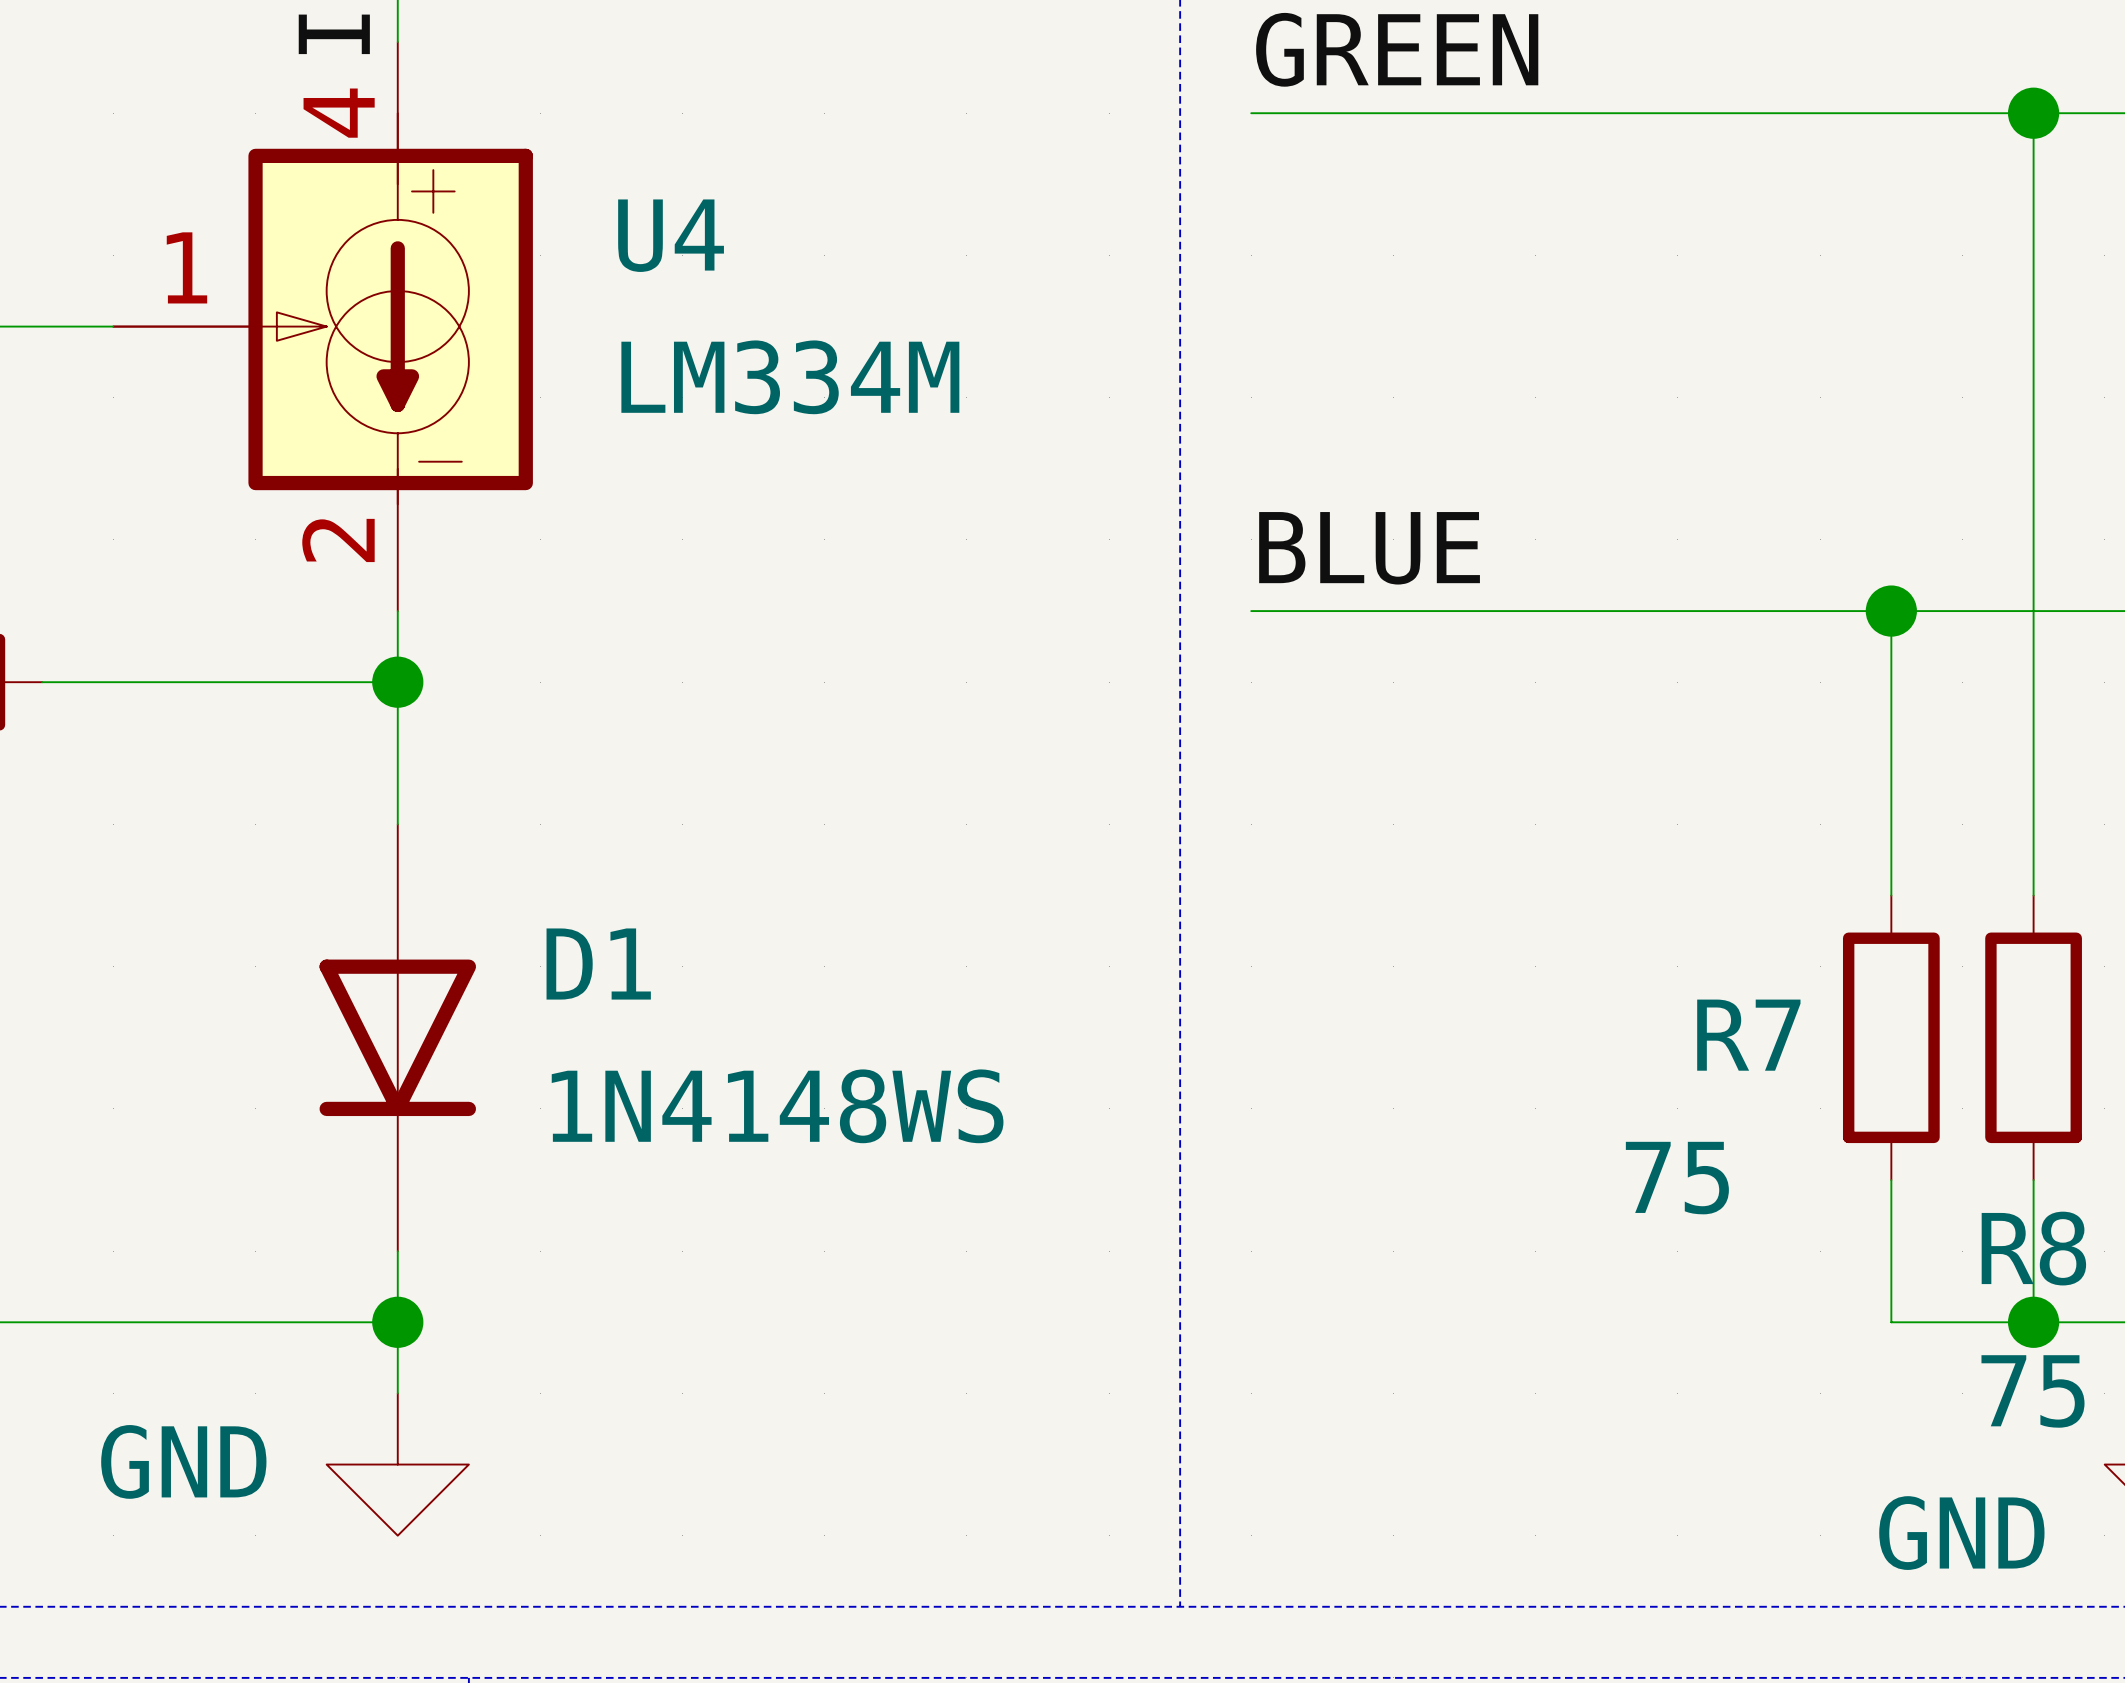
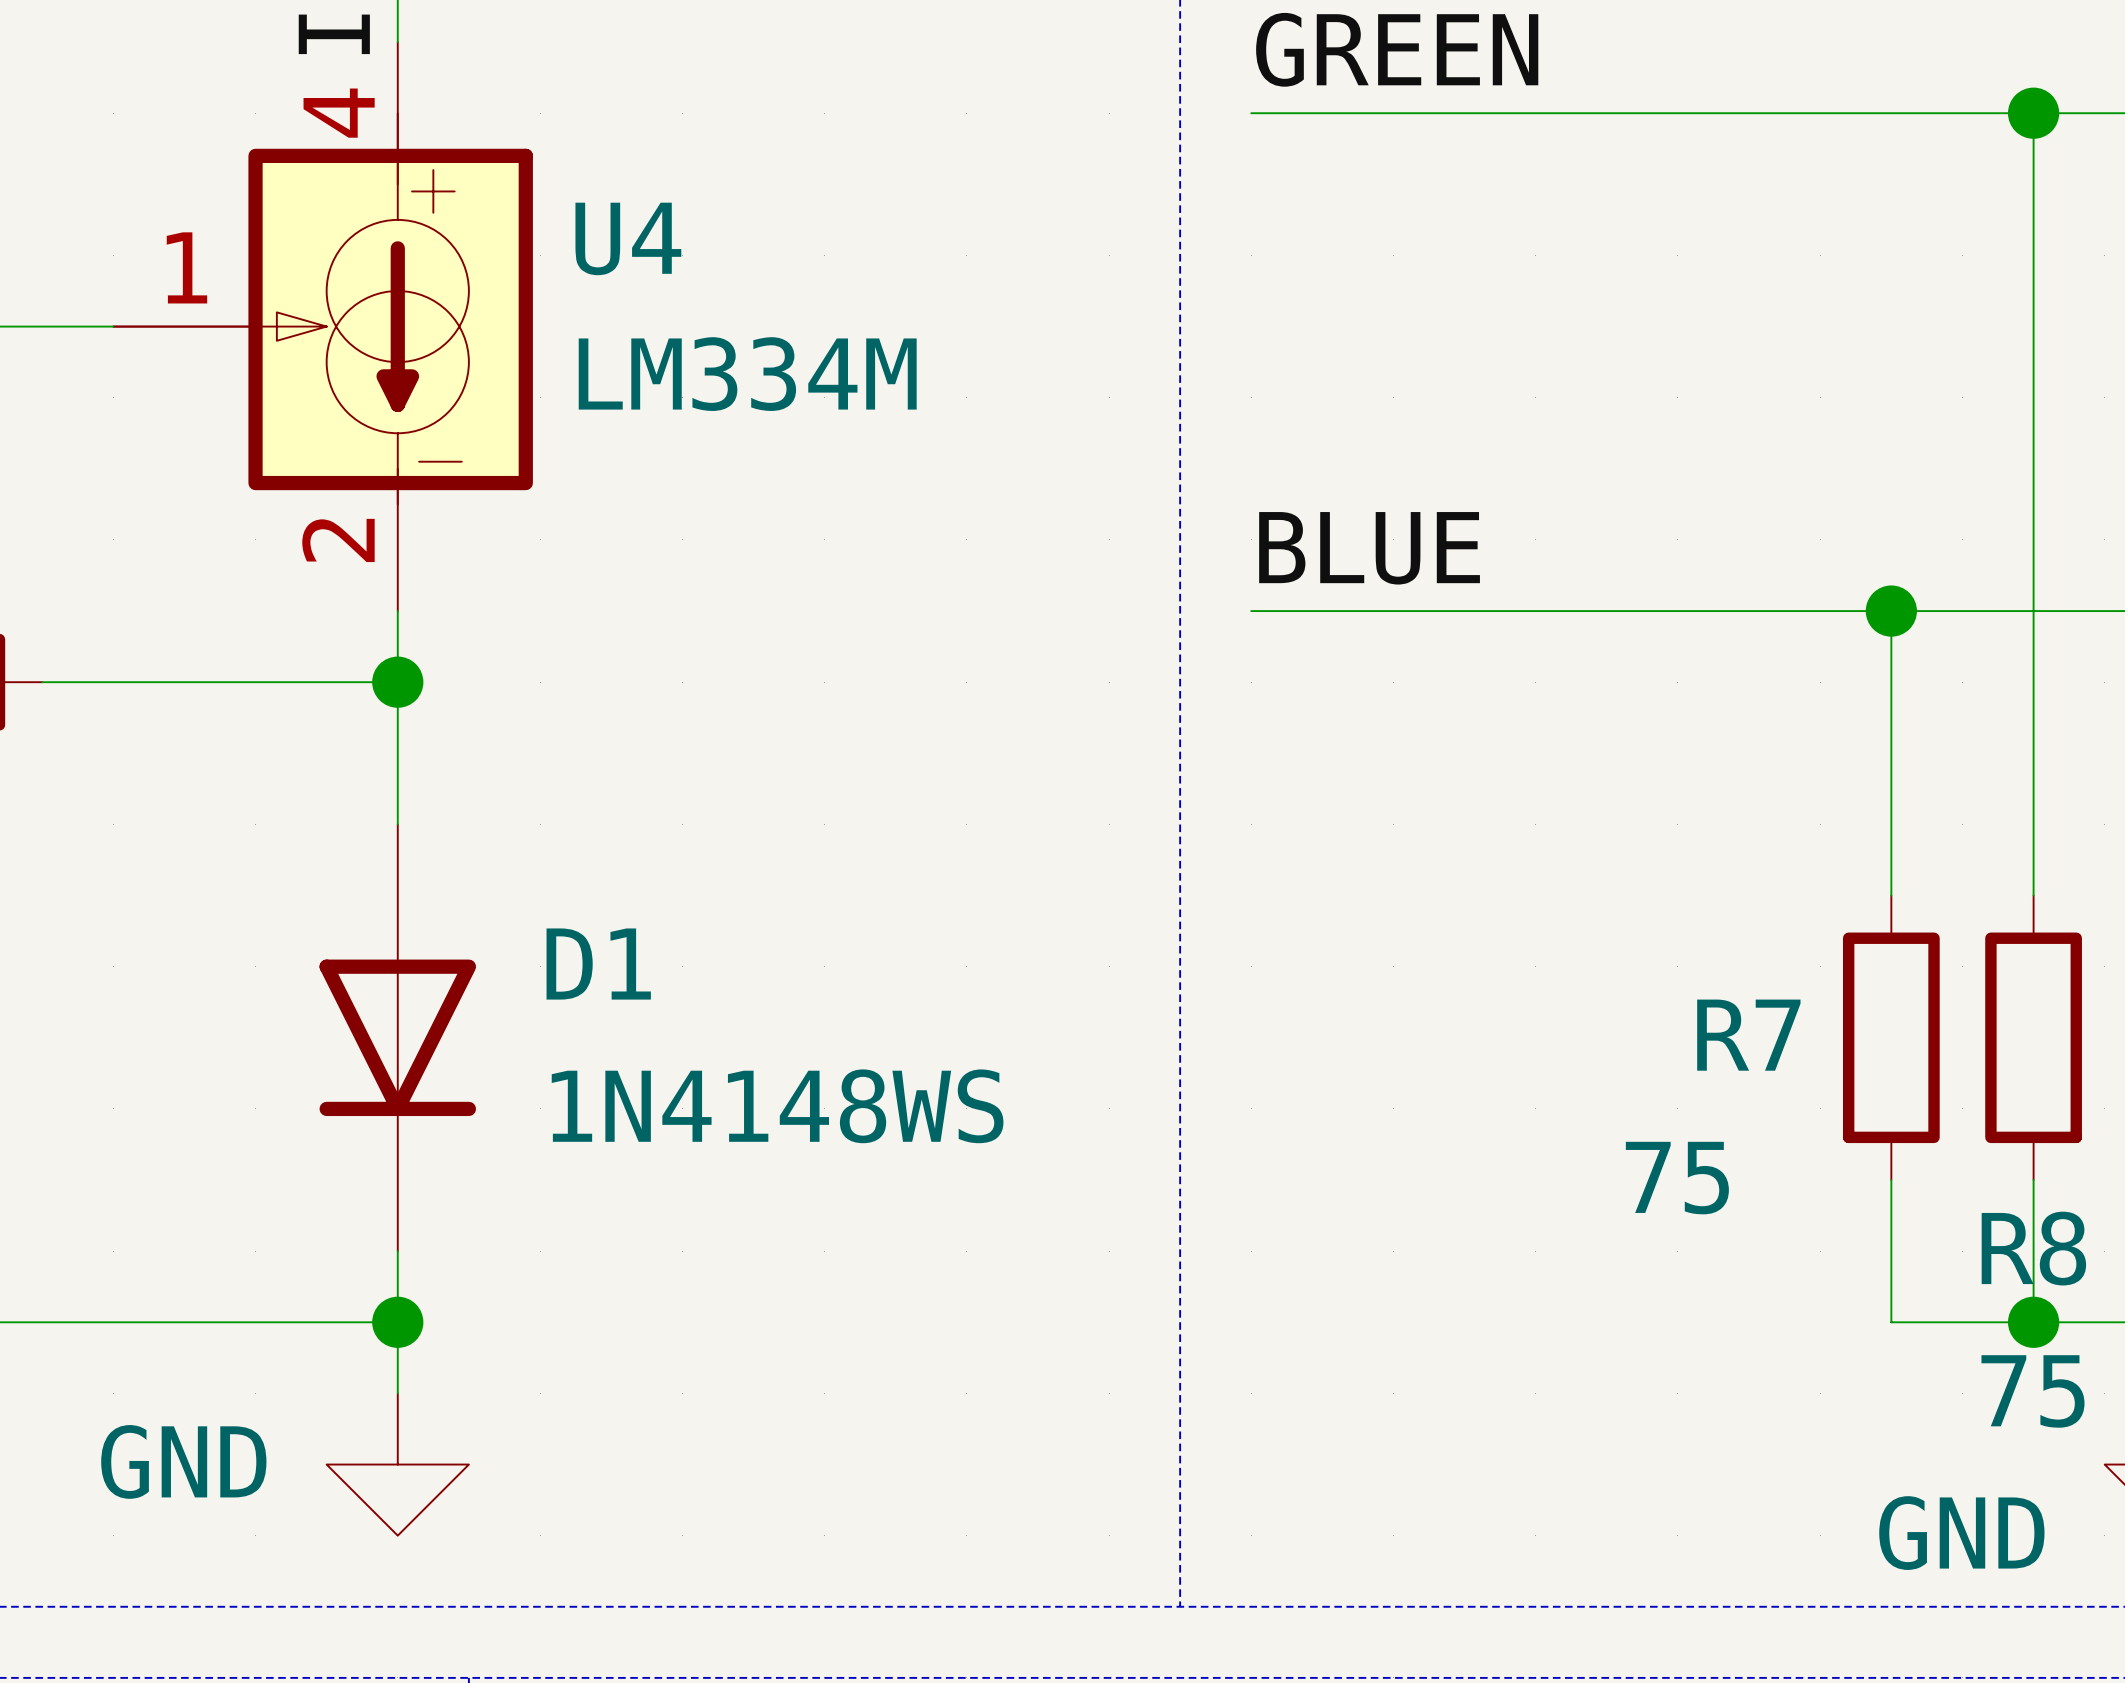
U4 name position: U4 (671, 235) -> U4 (628, 238)
U4 value position: LM334M (790, 377) -> LM334M (747, 374)

